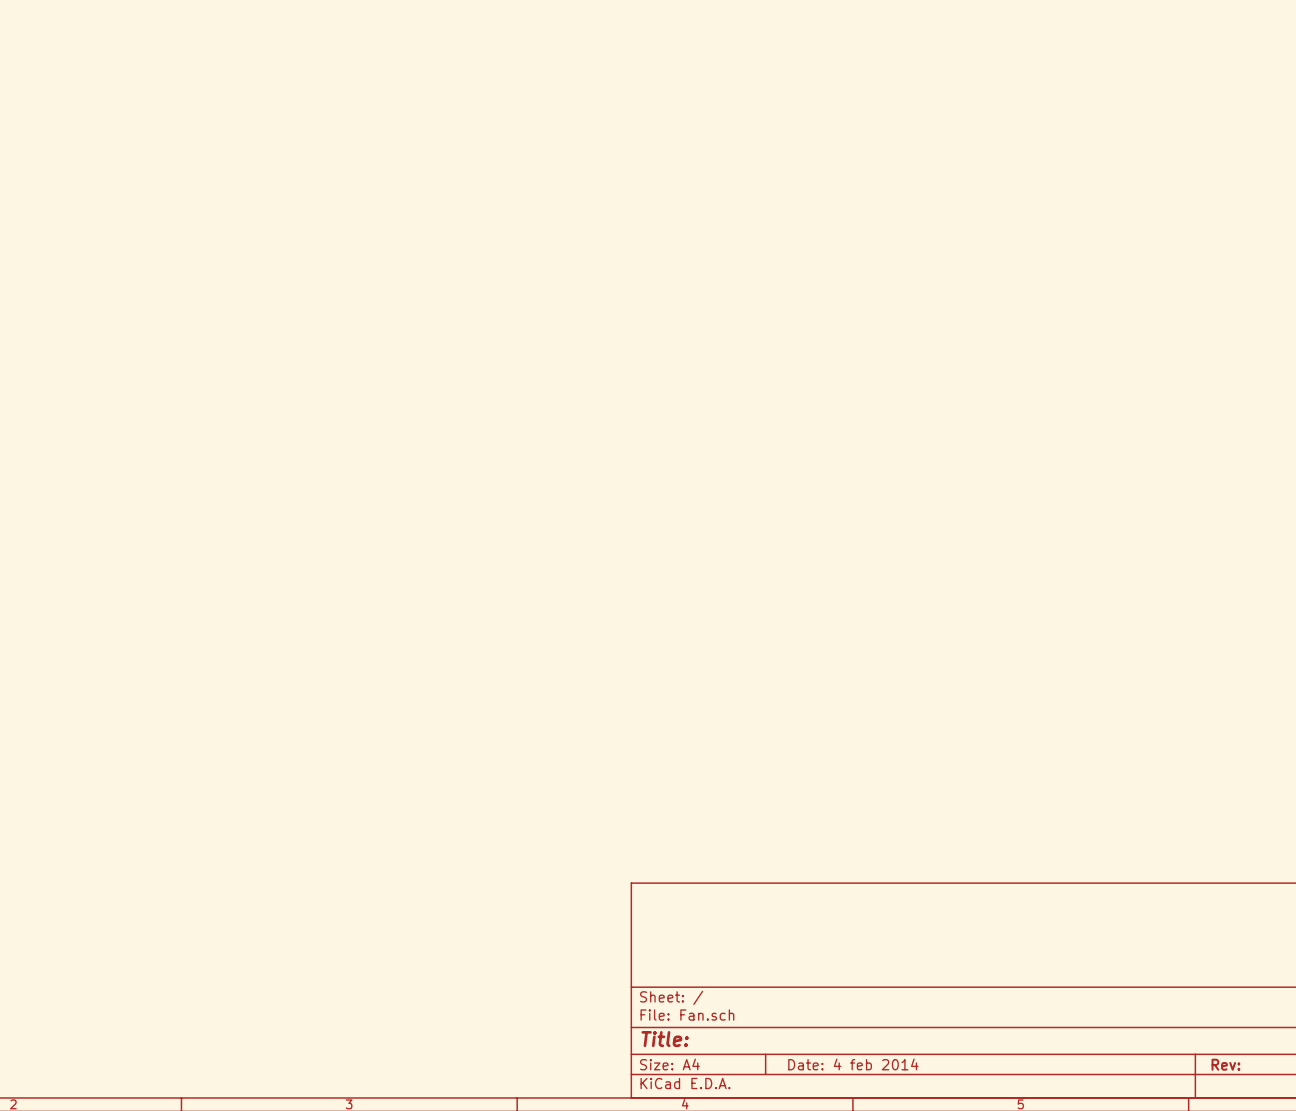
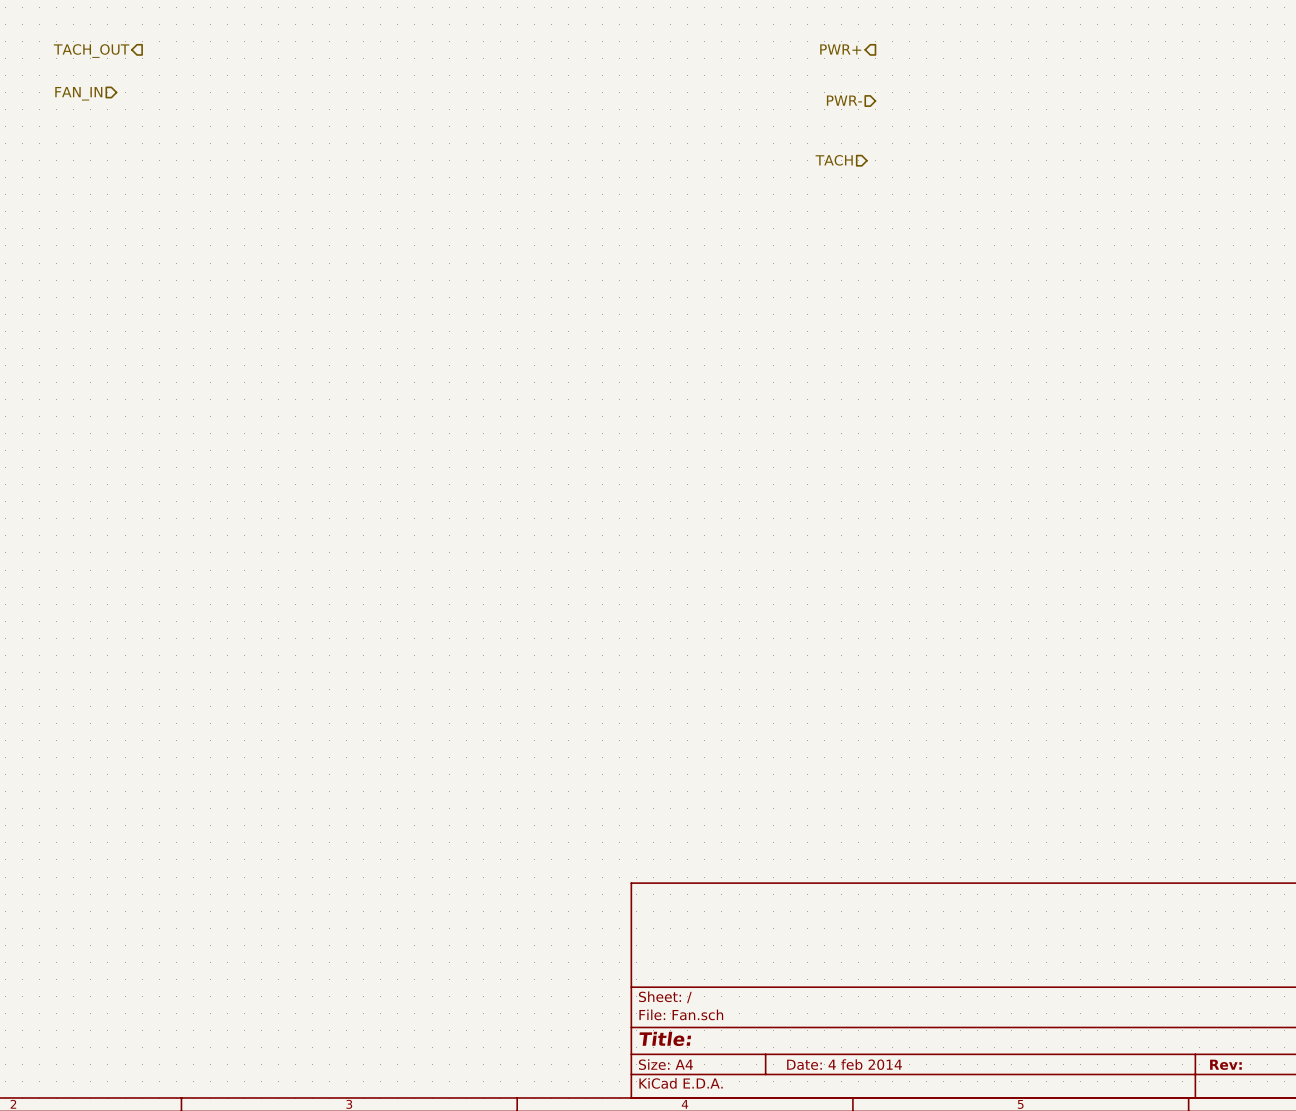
hierarchical label: none -> TACH_OUT (91, 51)
hierarchical label: none -> PWR+ (840, 49)
hierarchical label: none -> FAN_IN (78, 93)
hierarchical label: none -> PWR- (844, 100)
hierarchical label: none -> TACH (834, 160)

